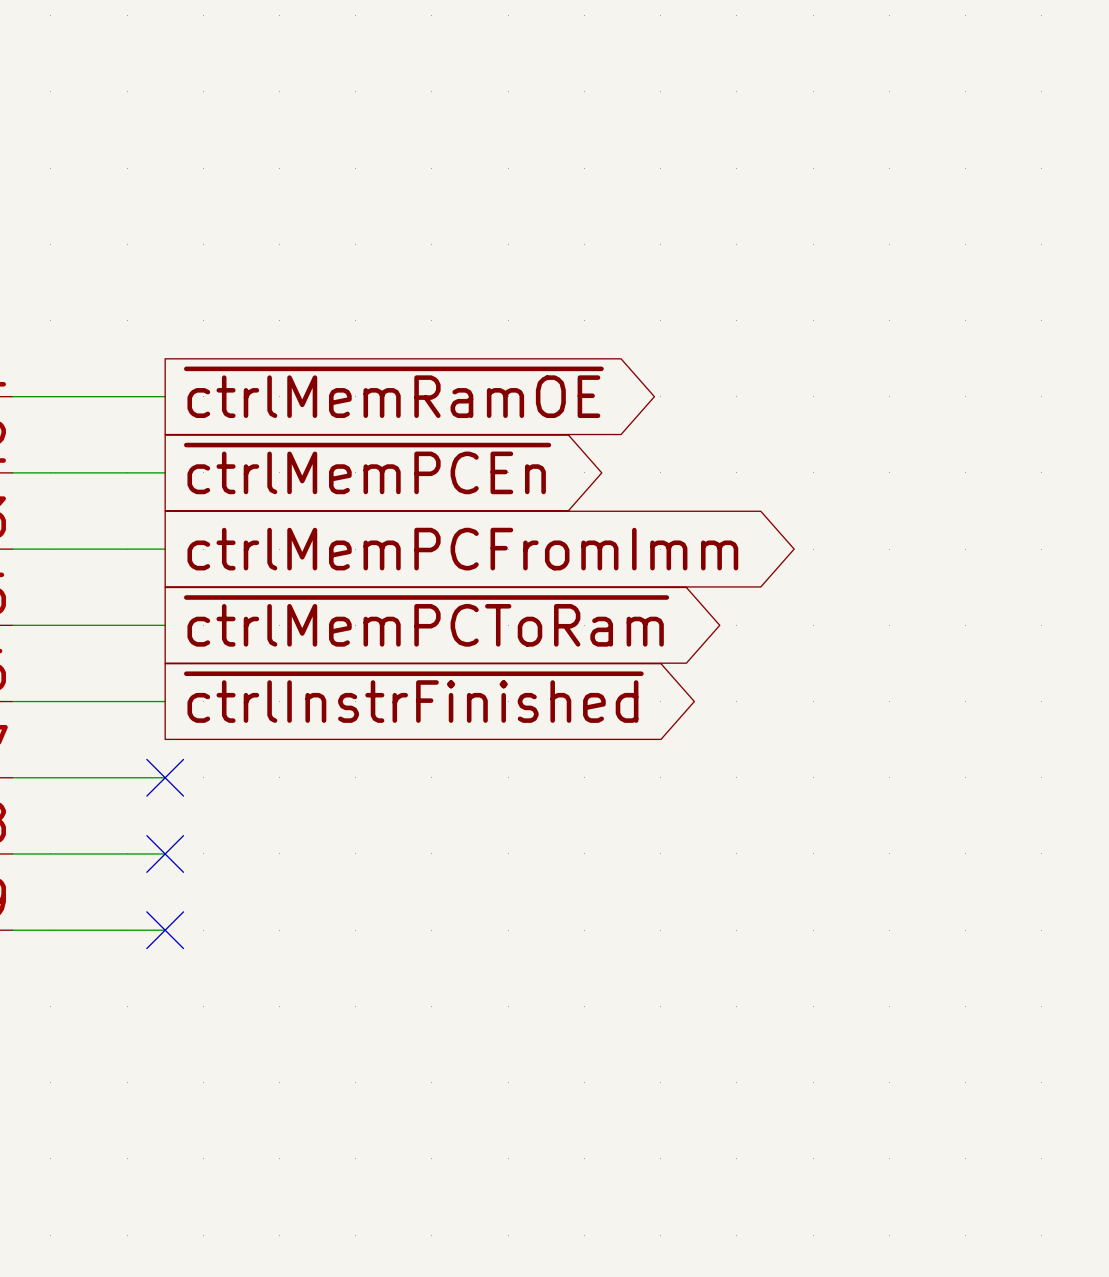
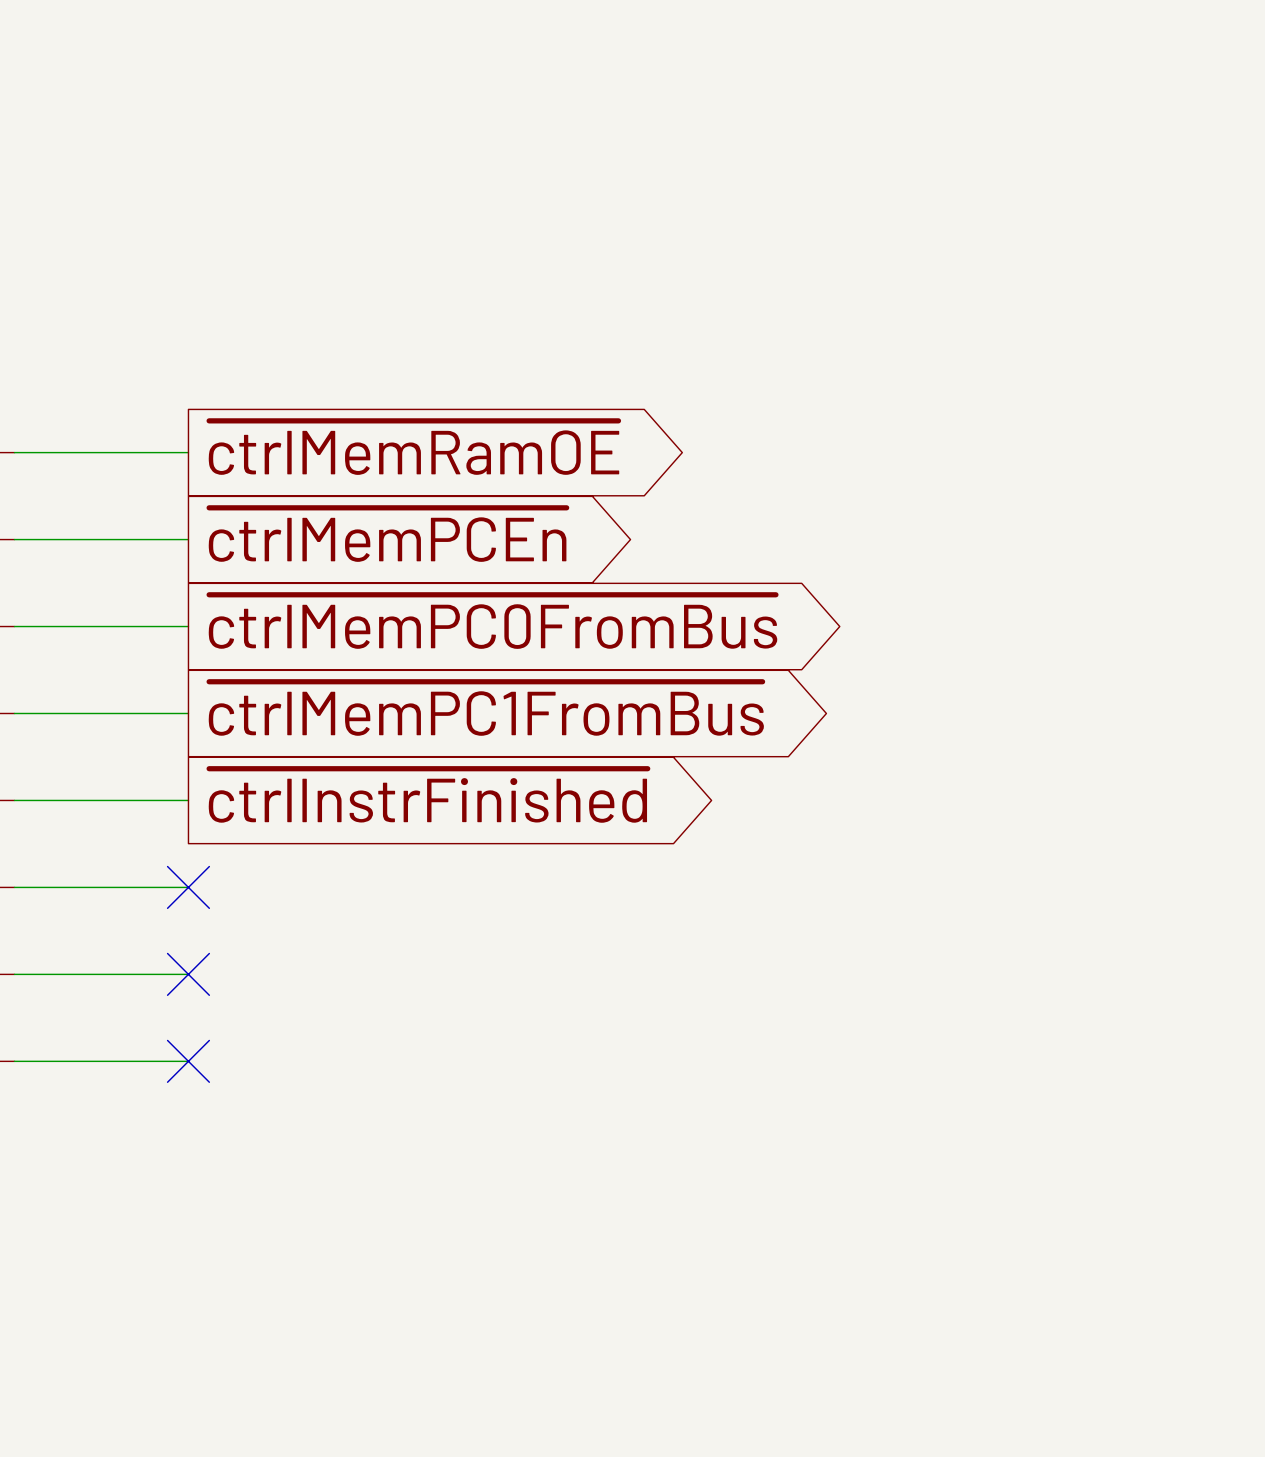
global label: ctrlMemPCFromImm (462, 549) -> ~{ctrlMemPC0FromBus} (492, 621)
global label: ~{ctrlMemPCToRam} (426, 620) -> ~{ctrlMemPC1FromBus} (486, 708)

